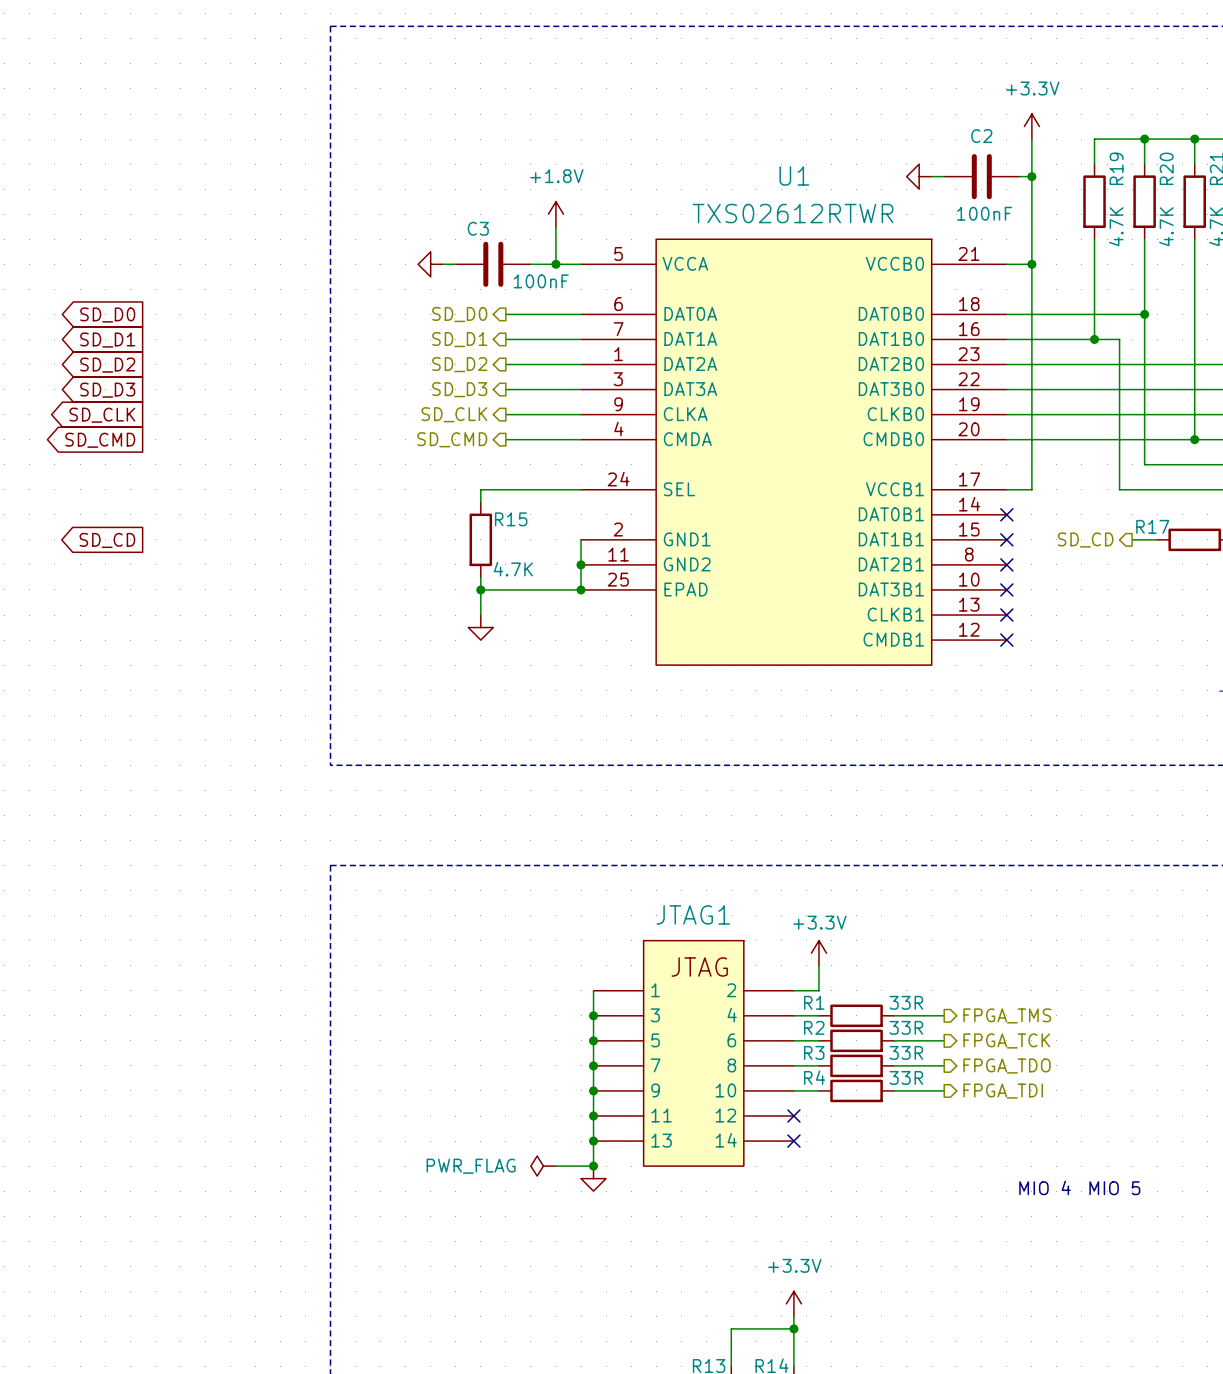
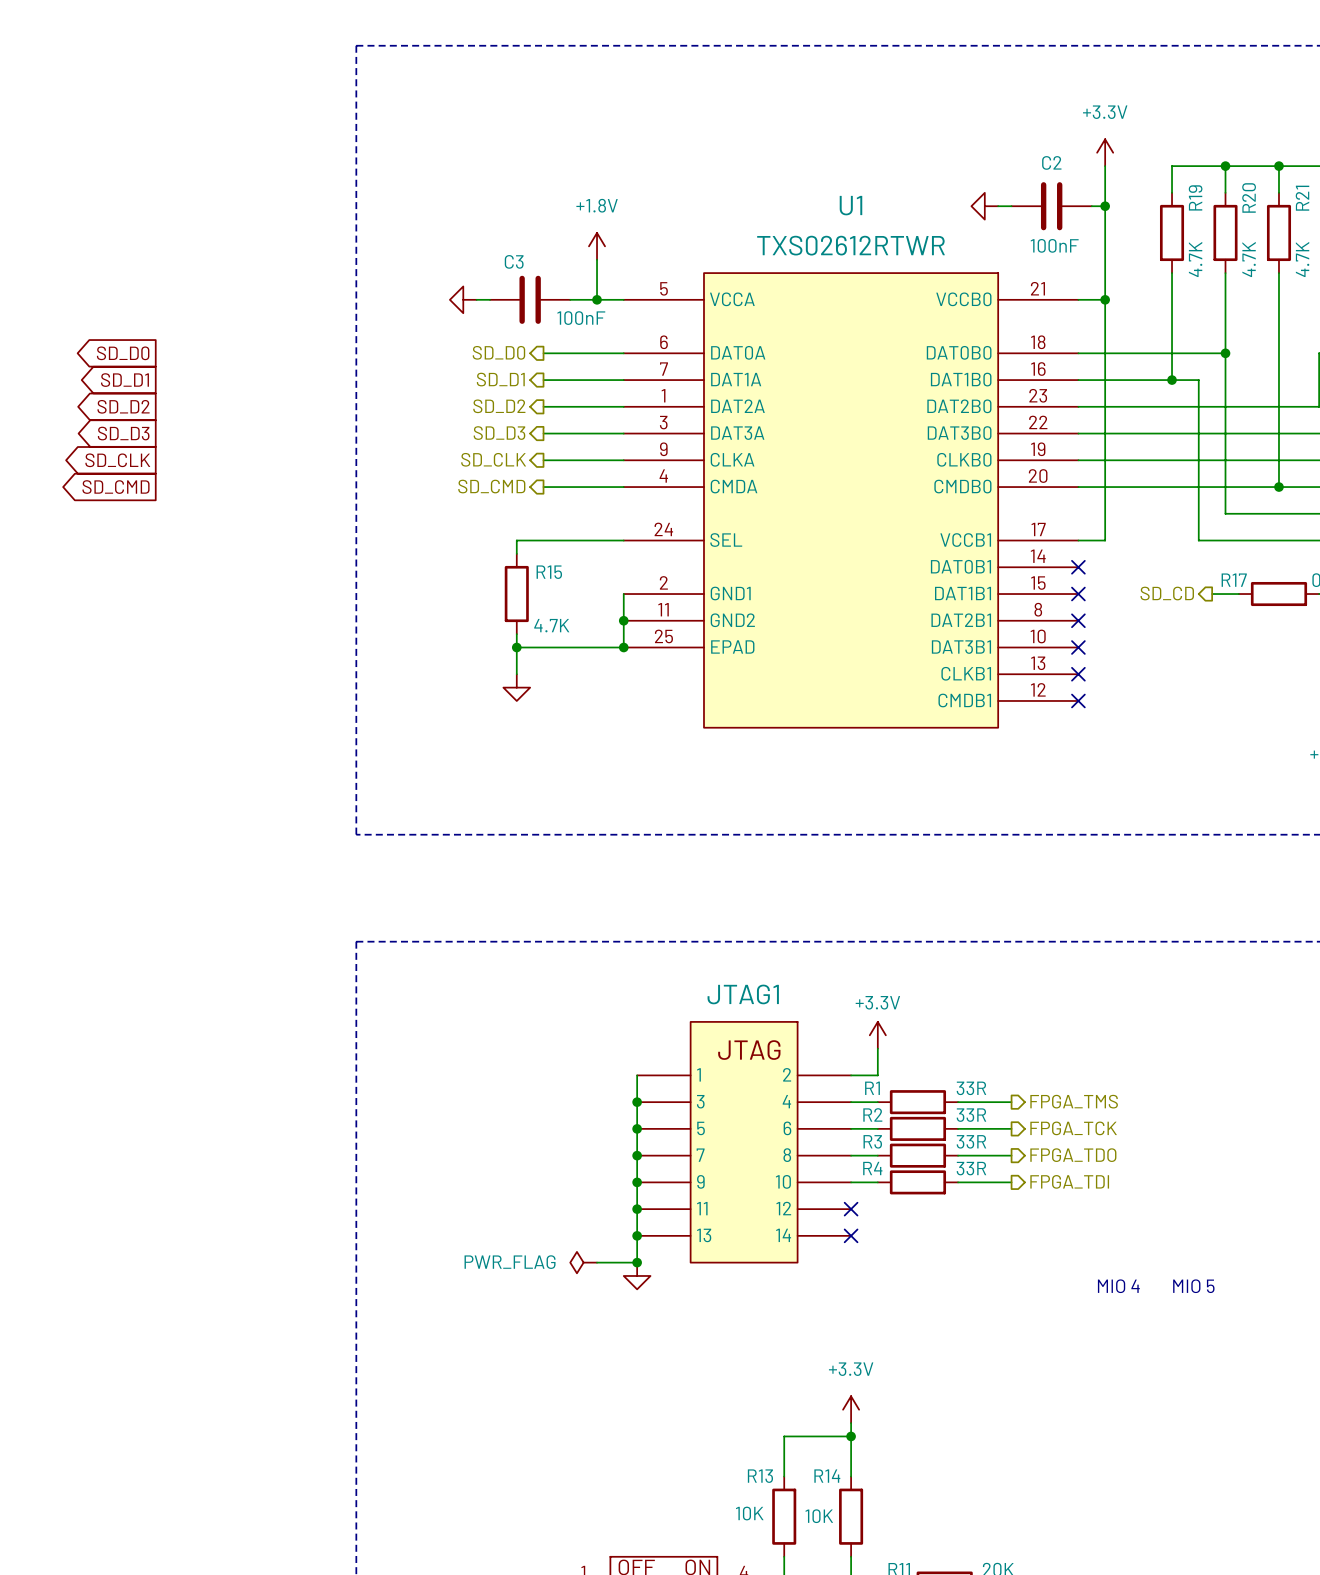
global label: SD_CD (107, 540) -> none

